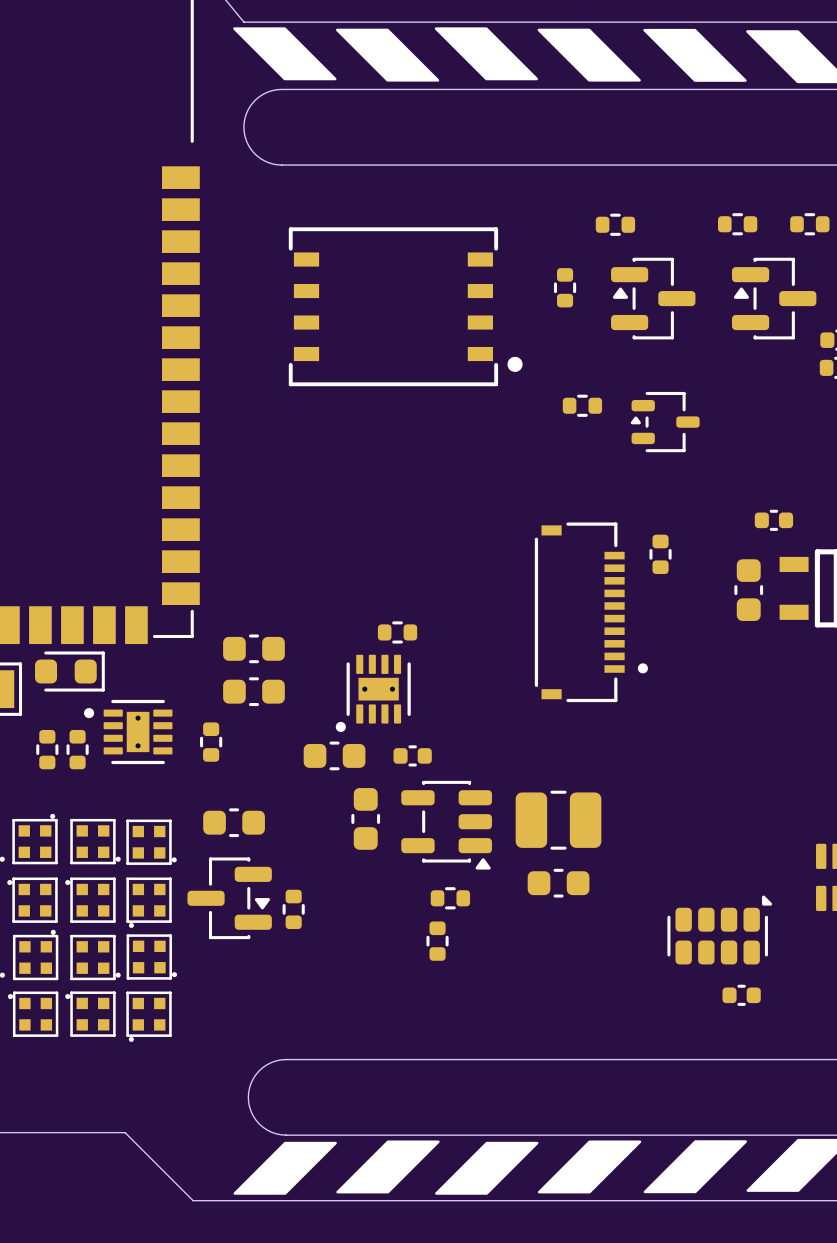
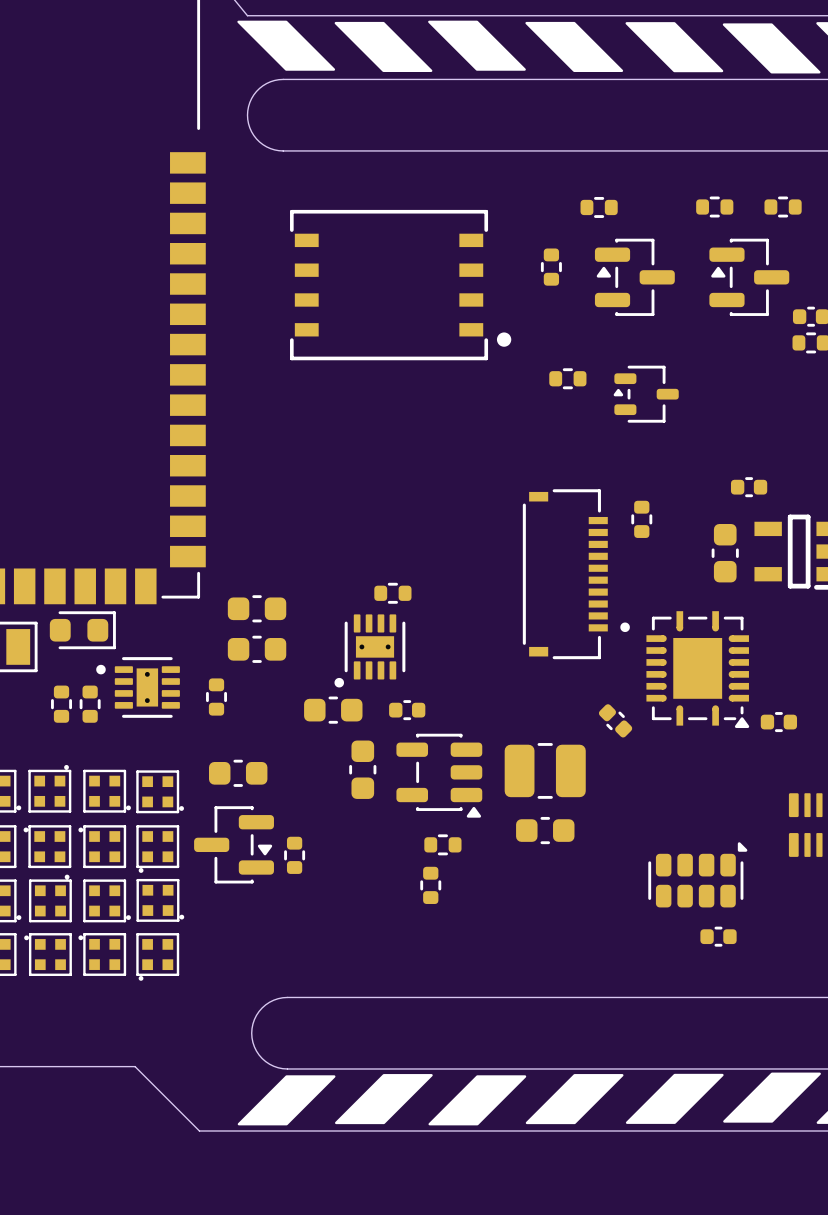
part: none -> (697, 669)
part: none -> (615, 720)
part: none -> (778, 722)

